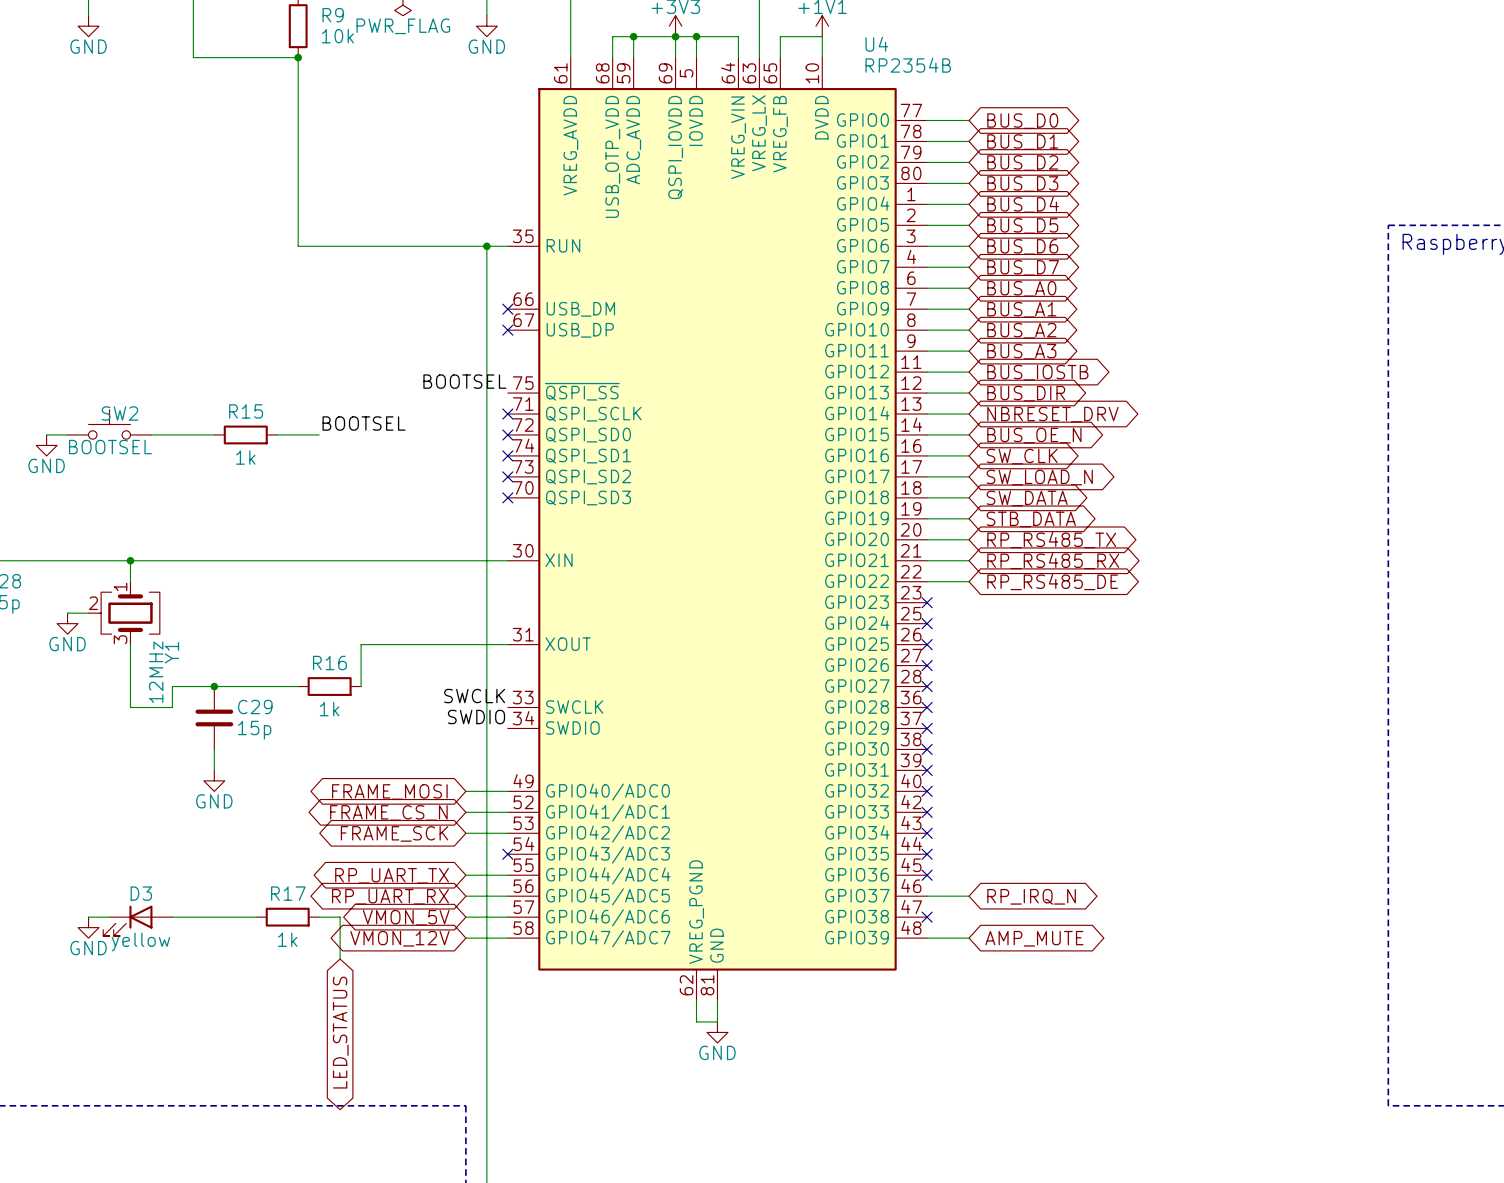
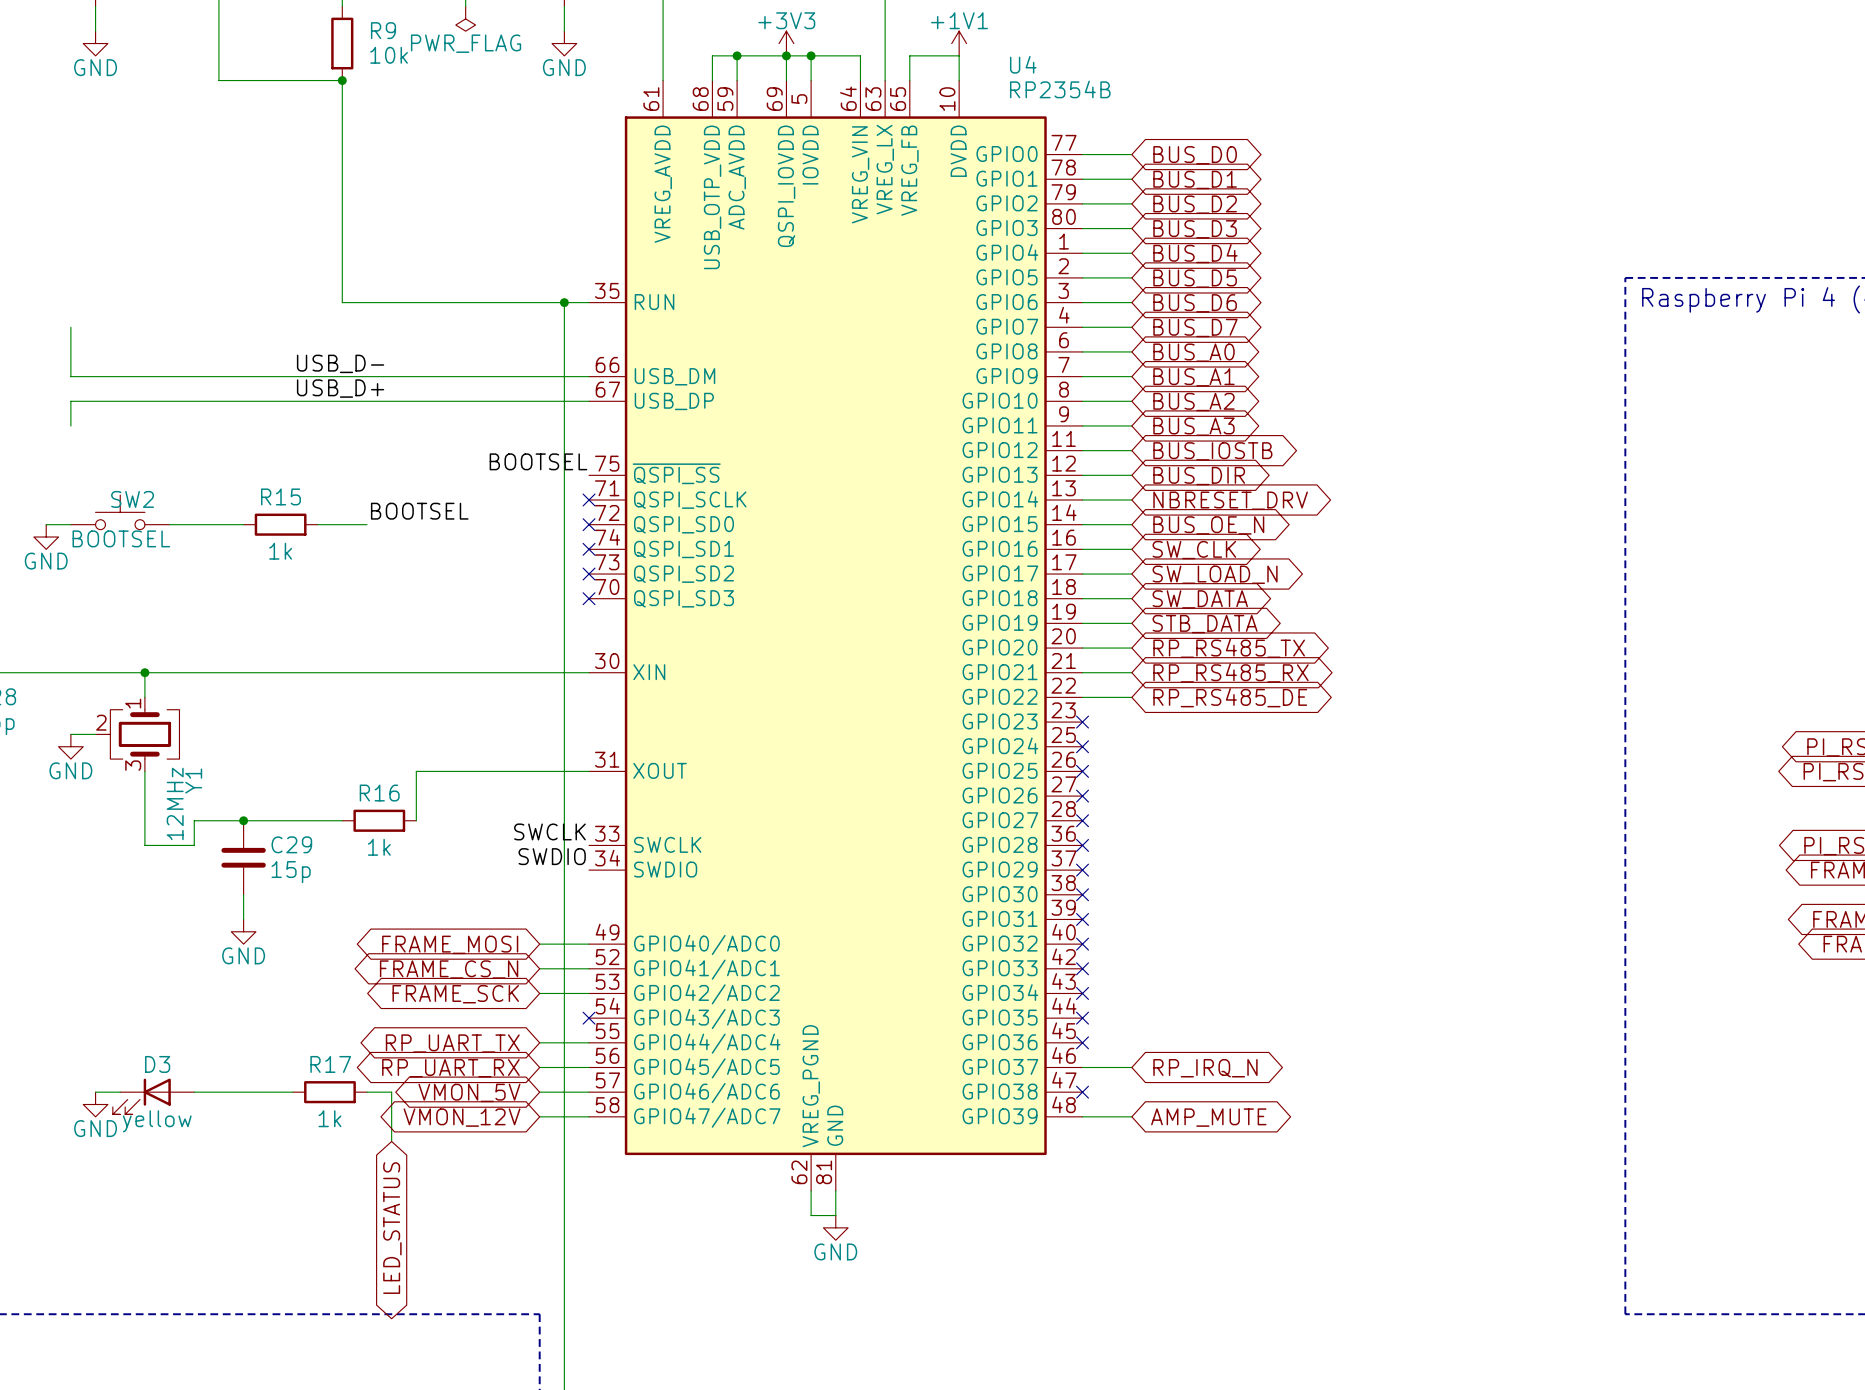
wire: none -> (70, 327) (70, 376) (589, 376)
label: none -> USB_D- (340, 363)
no-connect mark: (507, 309) -> none
label: none -> USB_D+ (340, 388)
wire: none -> (589, 401) (70, 401) (70, 425)
no-connect mark: (507, 330) -> none

